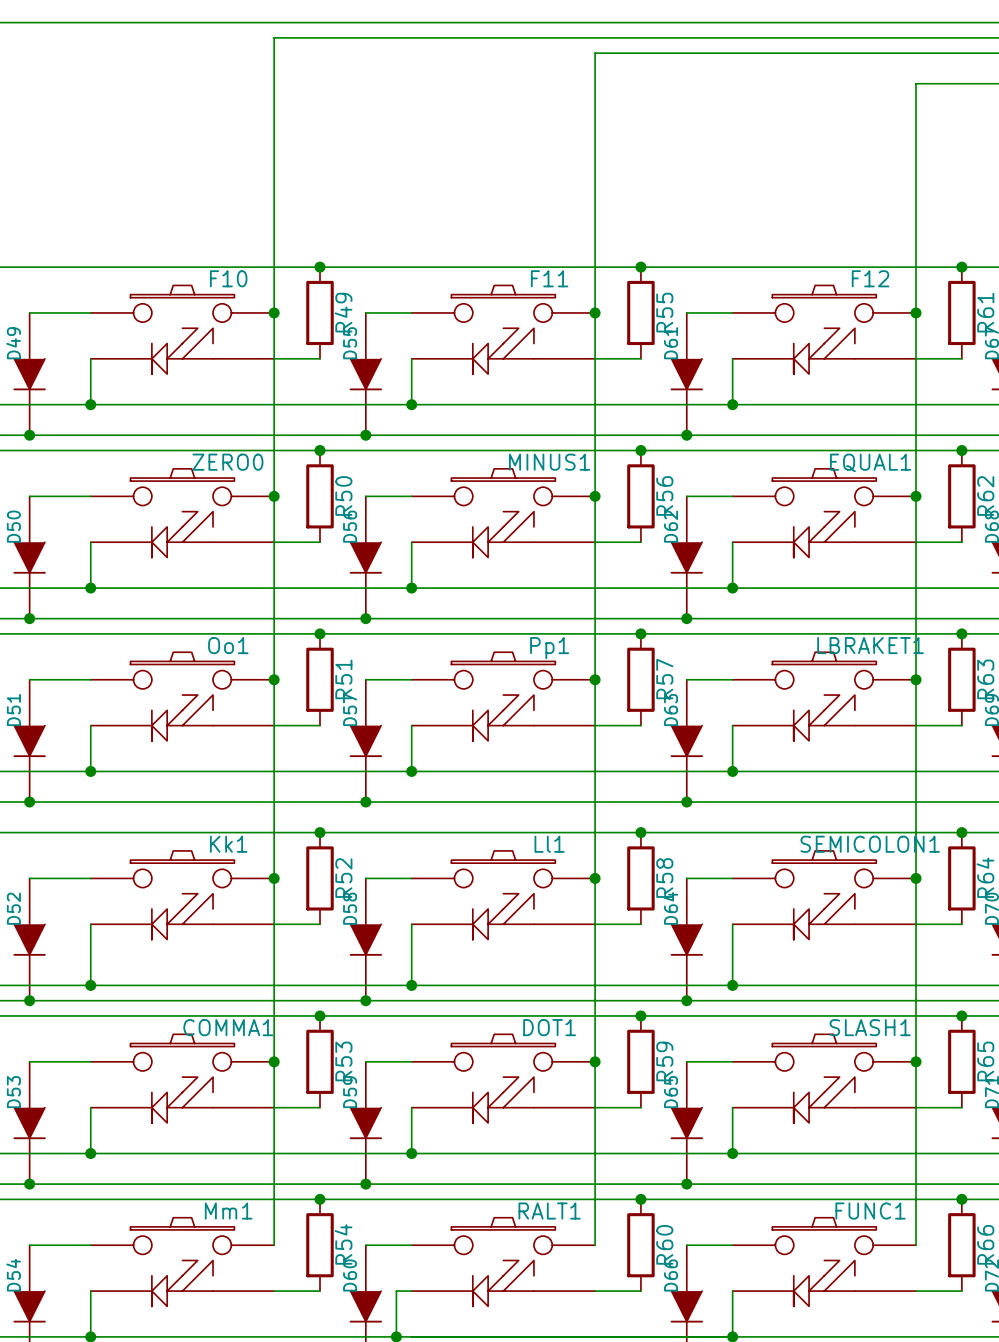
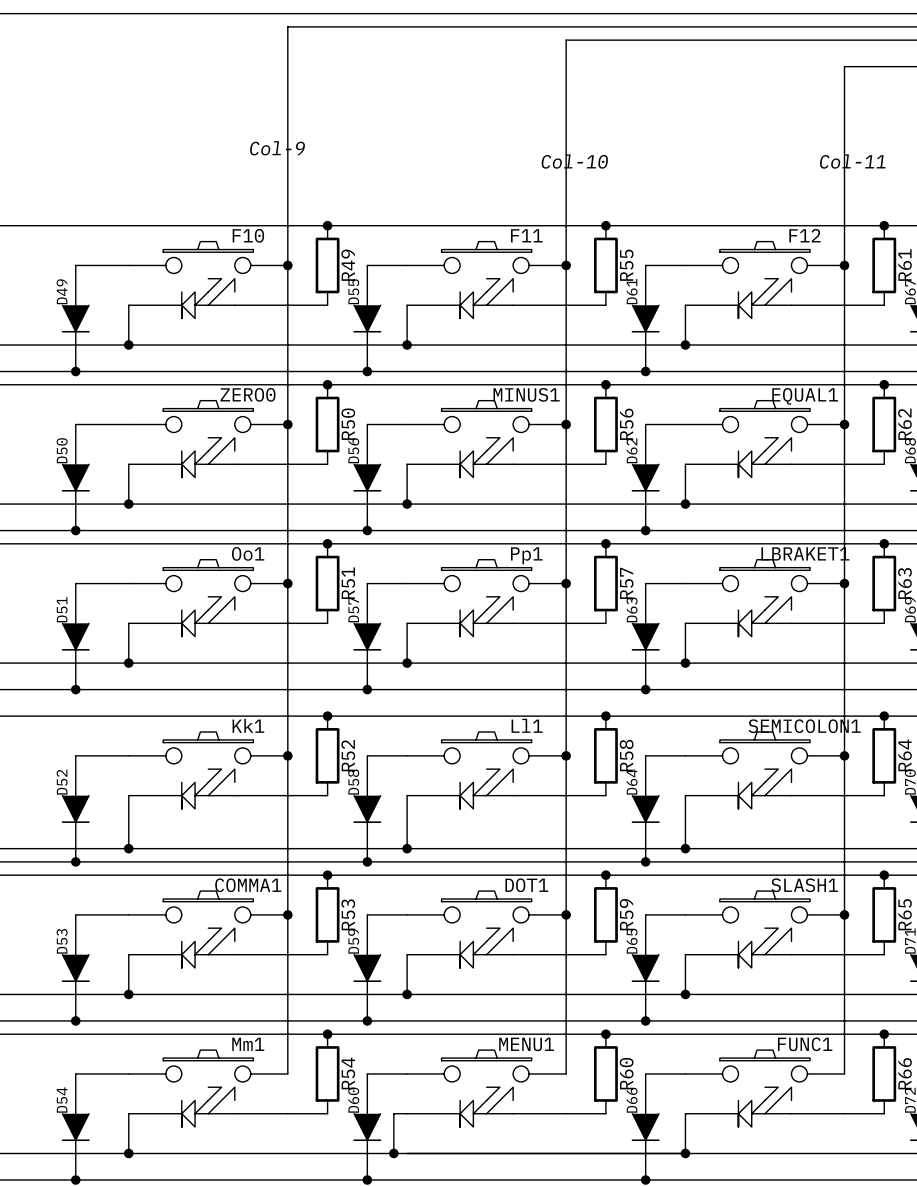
text: none -> Col-9 (277, 148)
text: none -> Col-10 (574, 161)
text: none -> Col-11 (852, 161)
RALT1 name: RALT1 (549, 1211) -> MENU1 (526, 1044)

